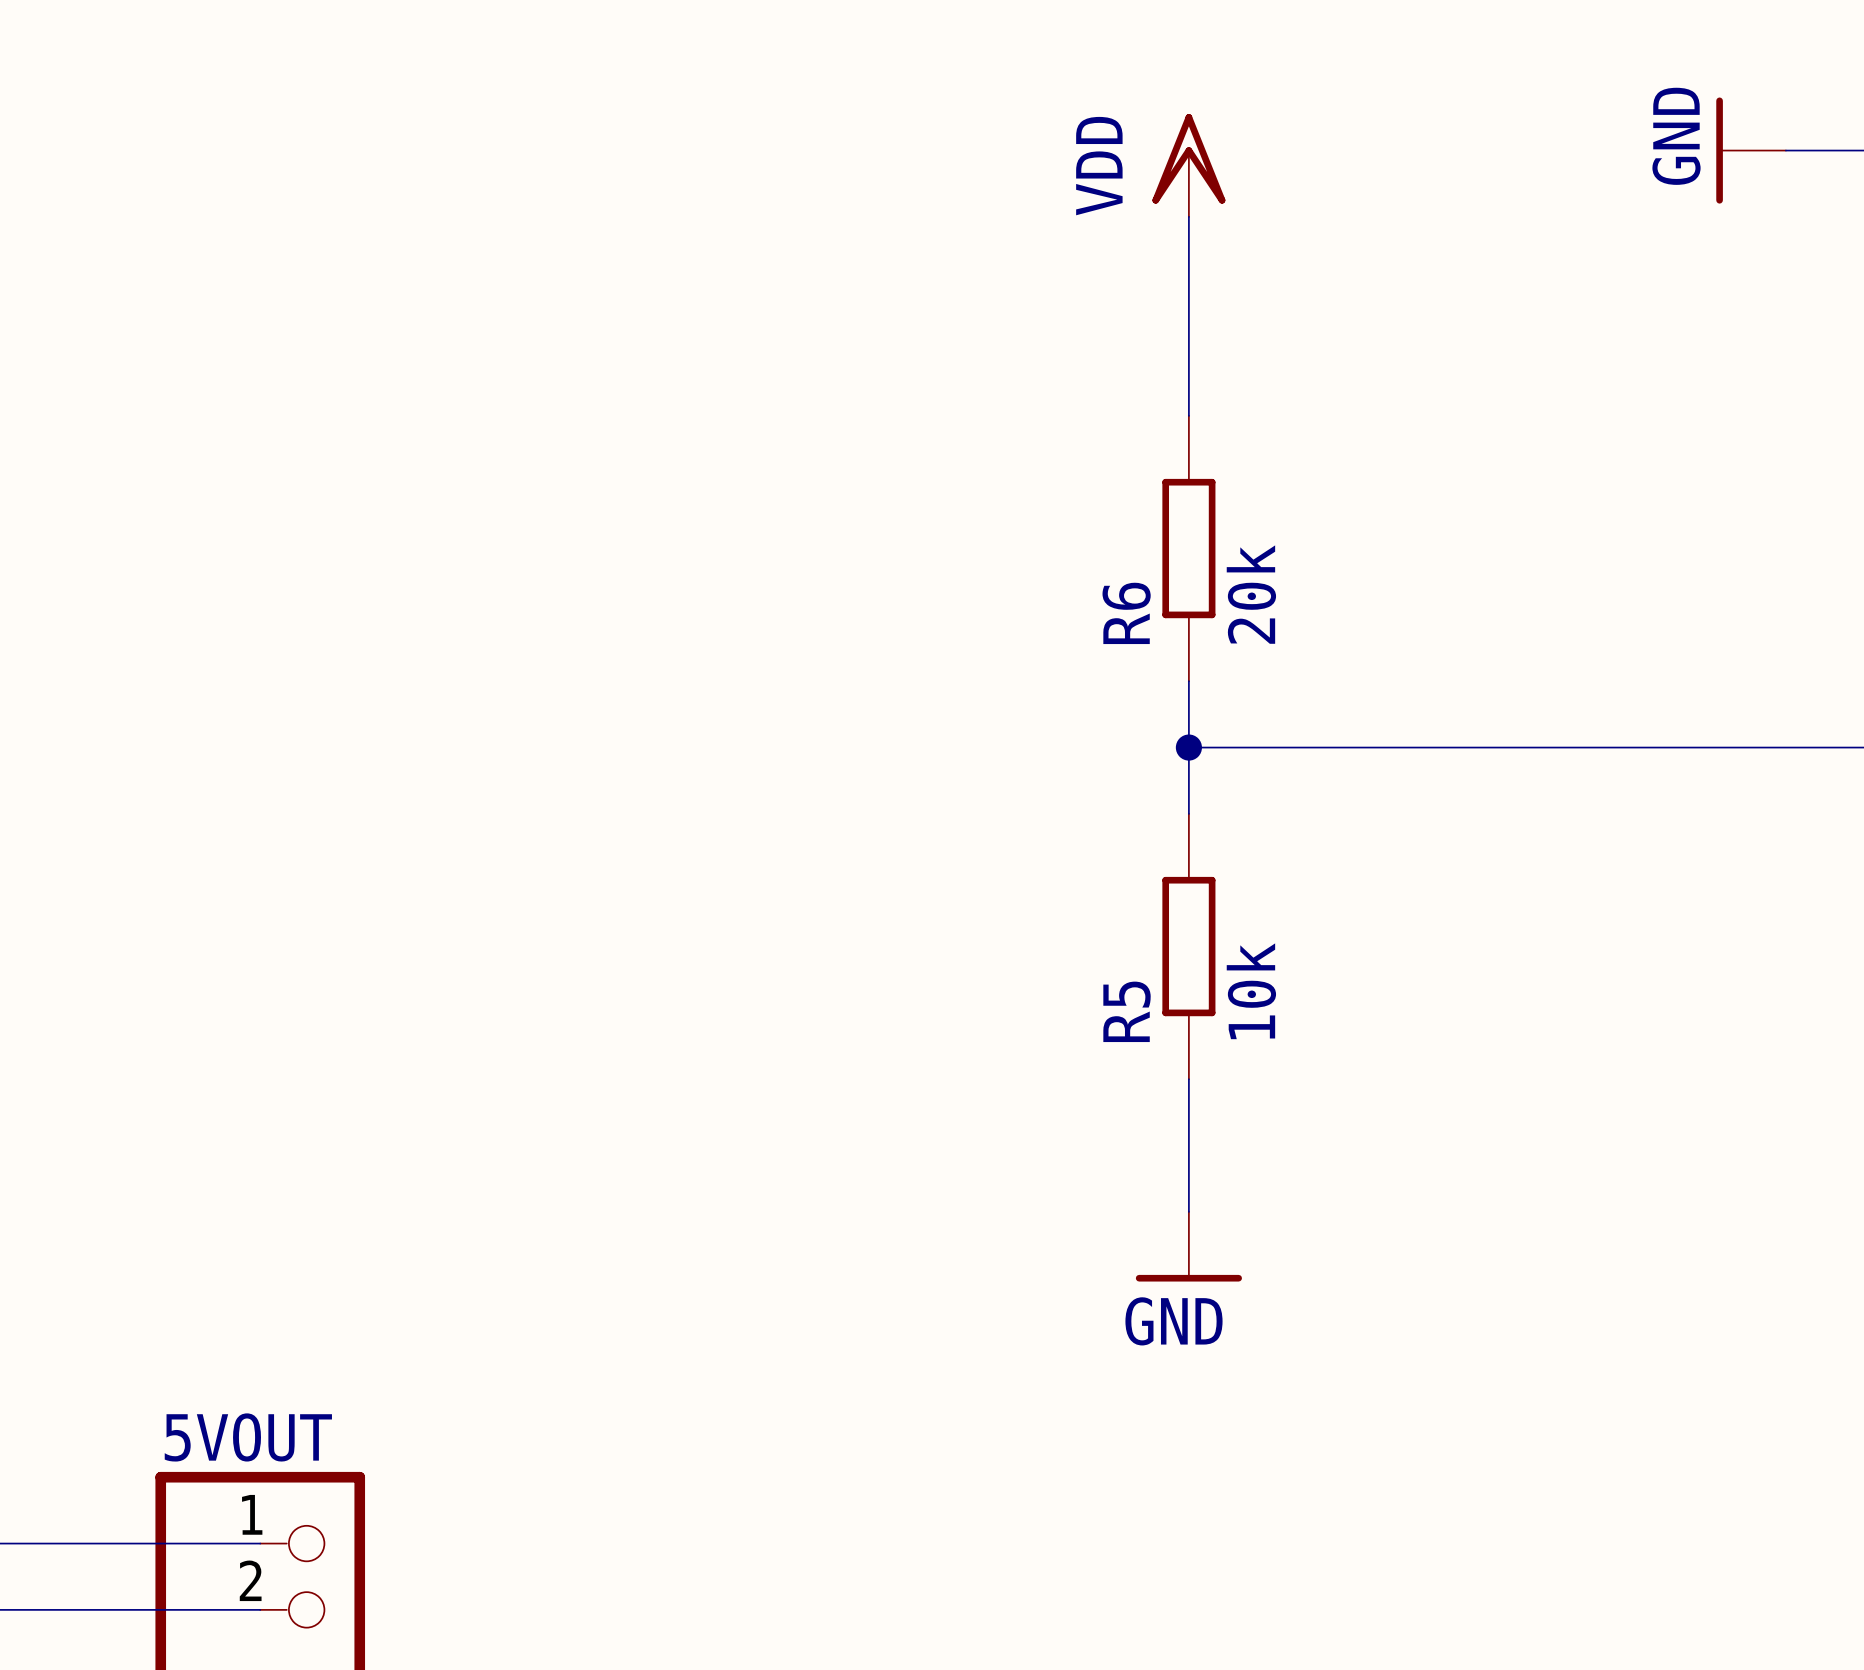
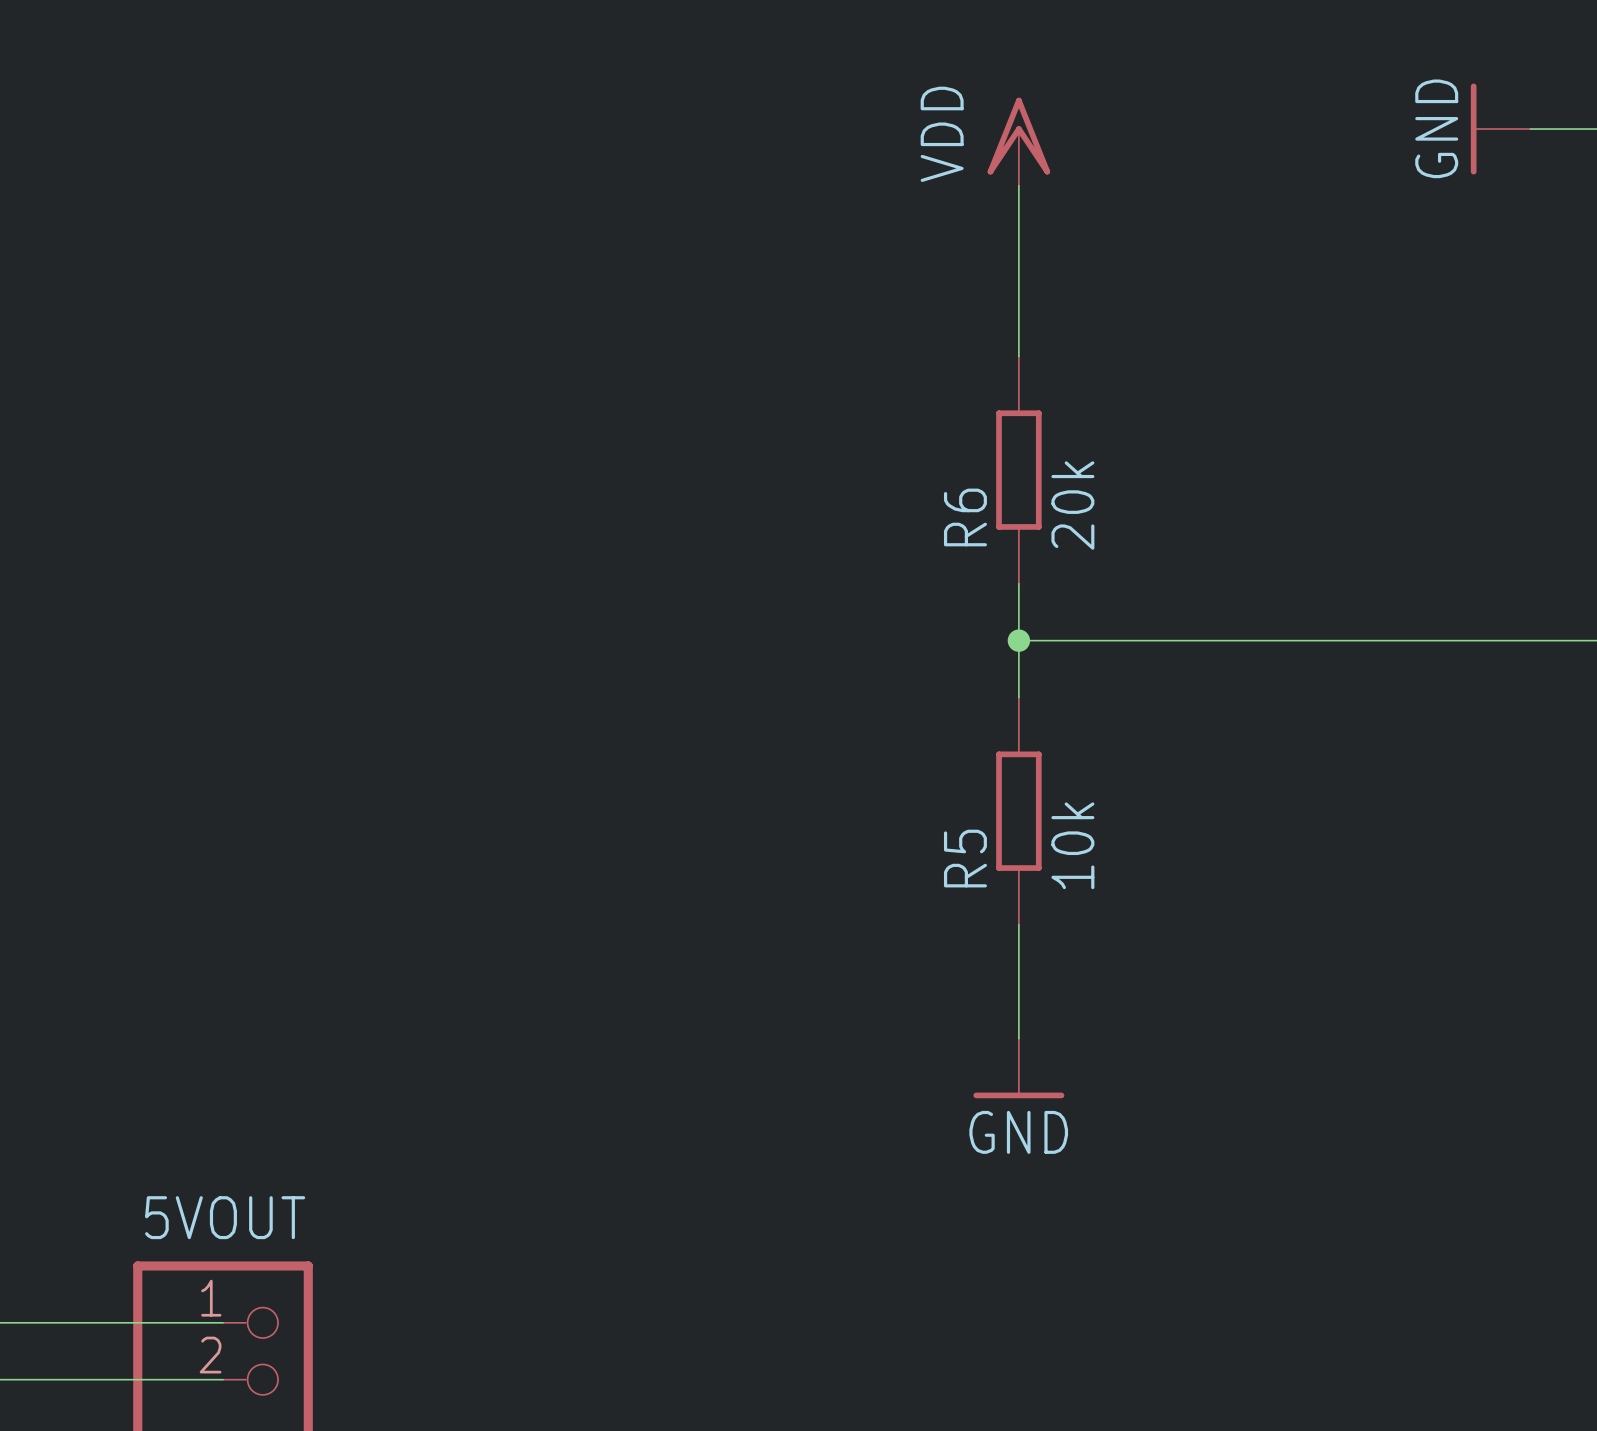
5VOUT name position: 5VOUT (248, 1437) -> 5VOUT (225, 1217)

